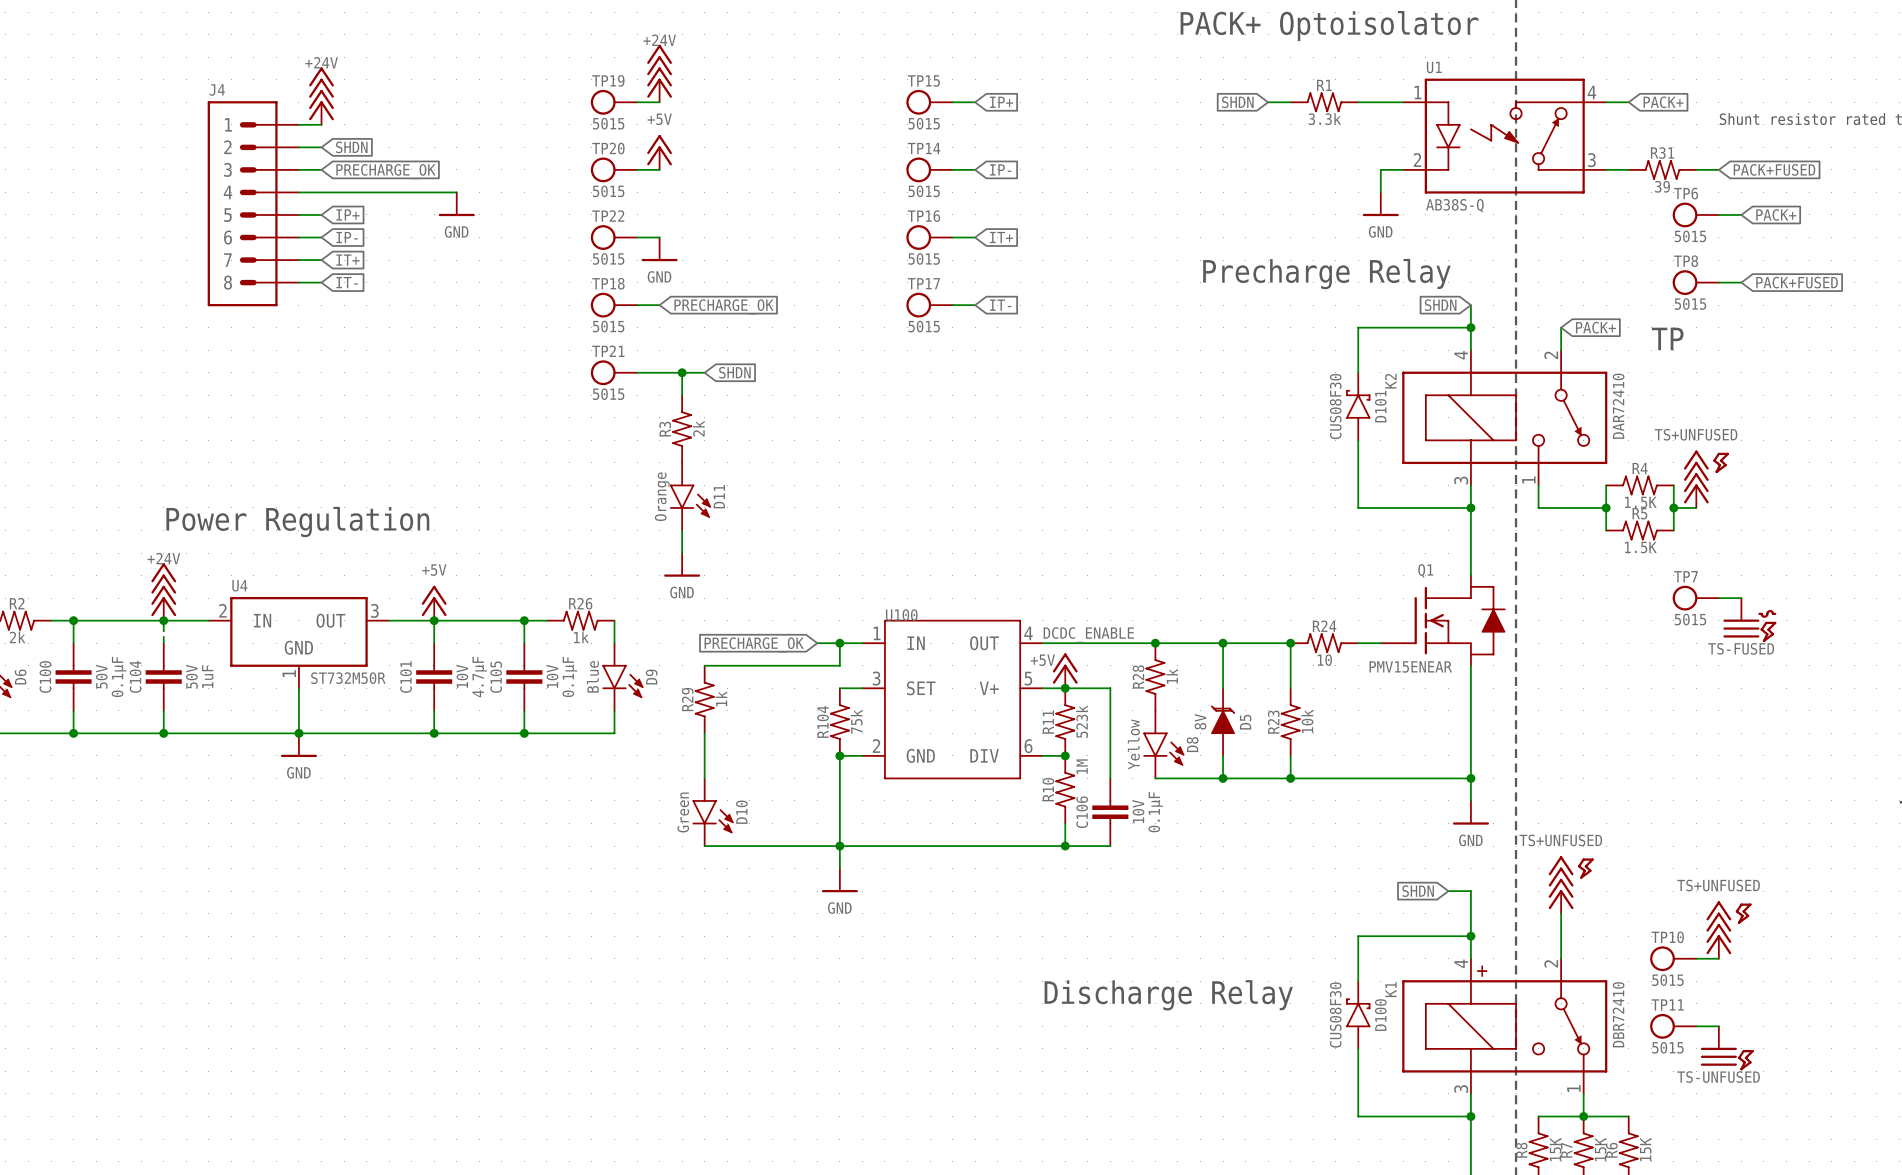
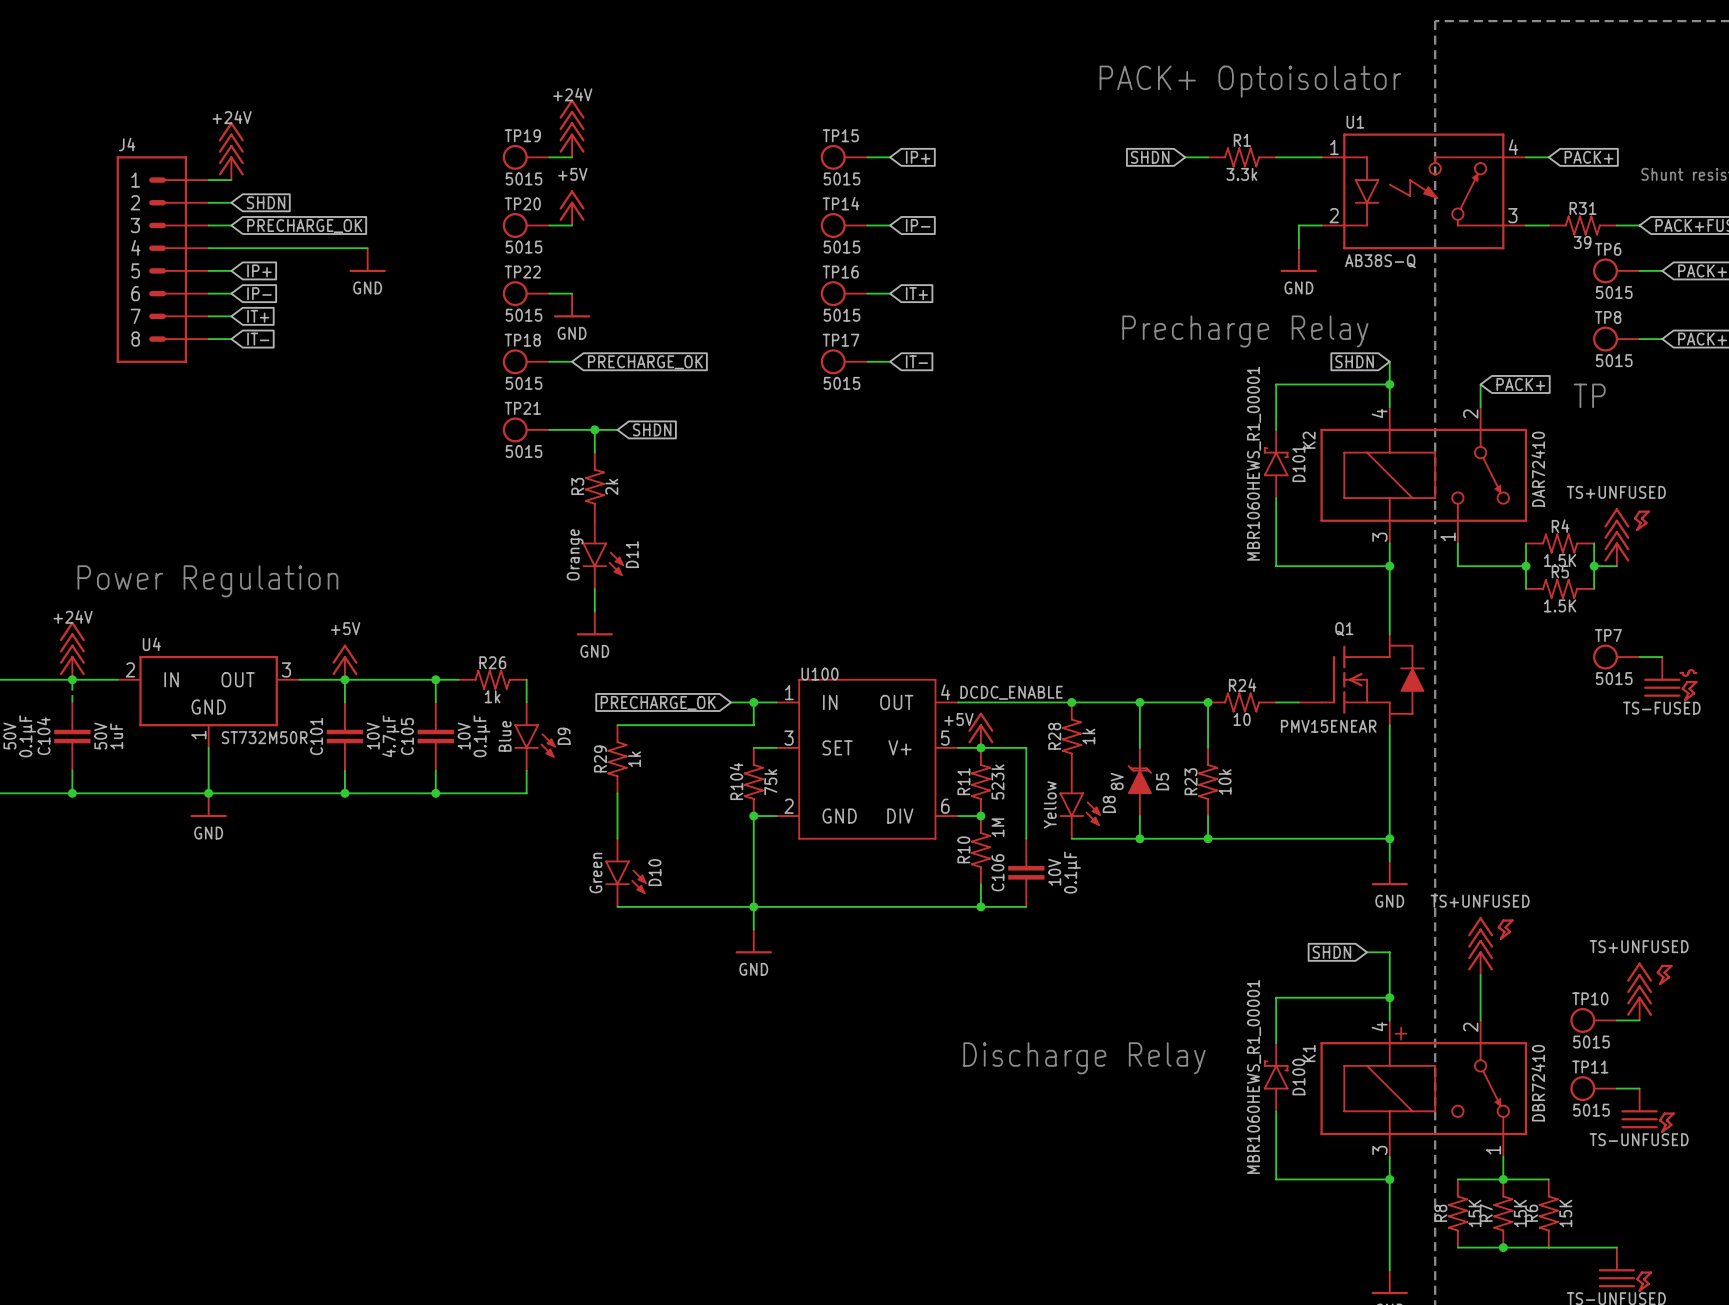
D101 text: CUS08F30 (1335, 406) -> MBR1060HEWS_R1_00001 (1254, 463)
D100 text: CUS08F30 (1335, 1015) -> MBR1060HEWS_R1_00001 (1254, 1076)

